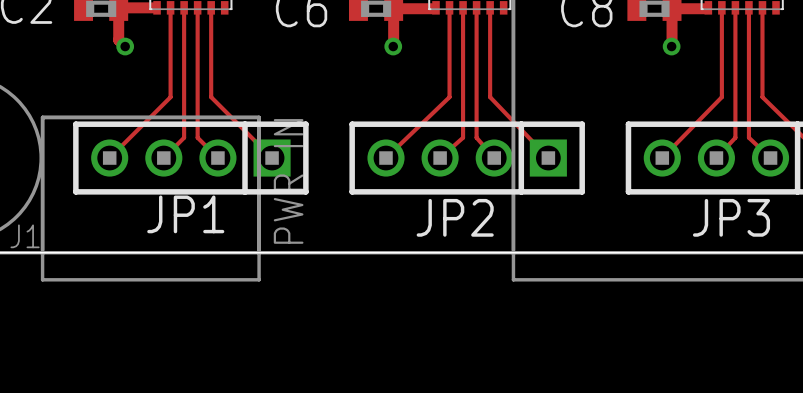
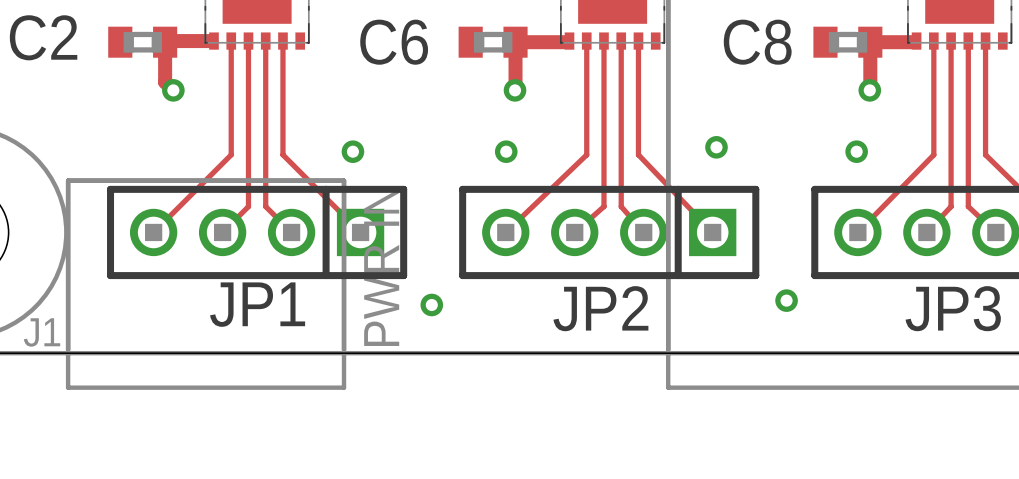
via: none -> (716, 147)
via: none -> (352, 151)
via: none -> (506, 151)
via: none -> (856, 151)
via: none -> (786, 300)
via: none -> (431, 305)

